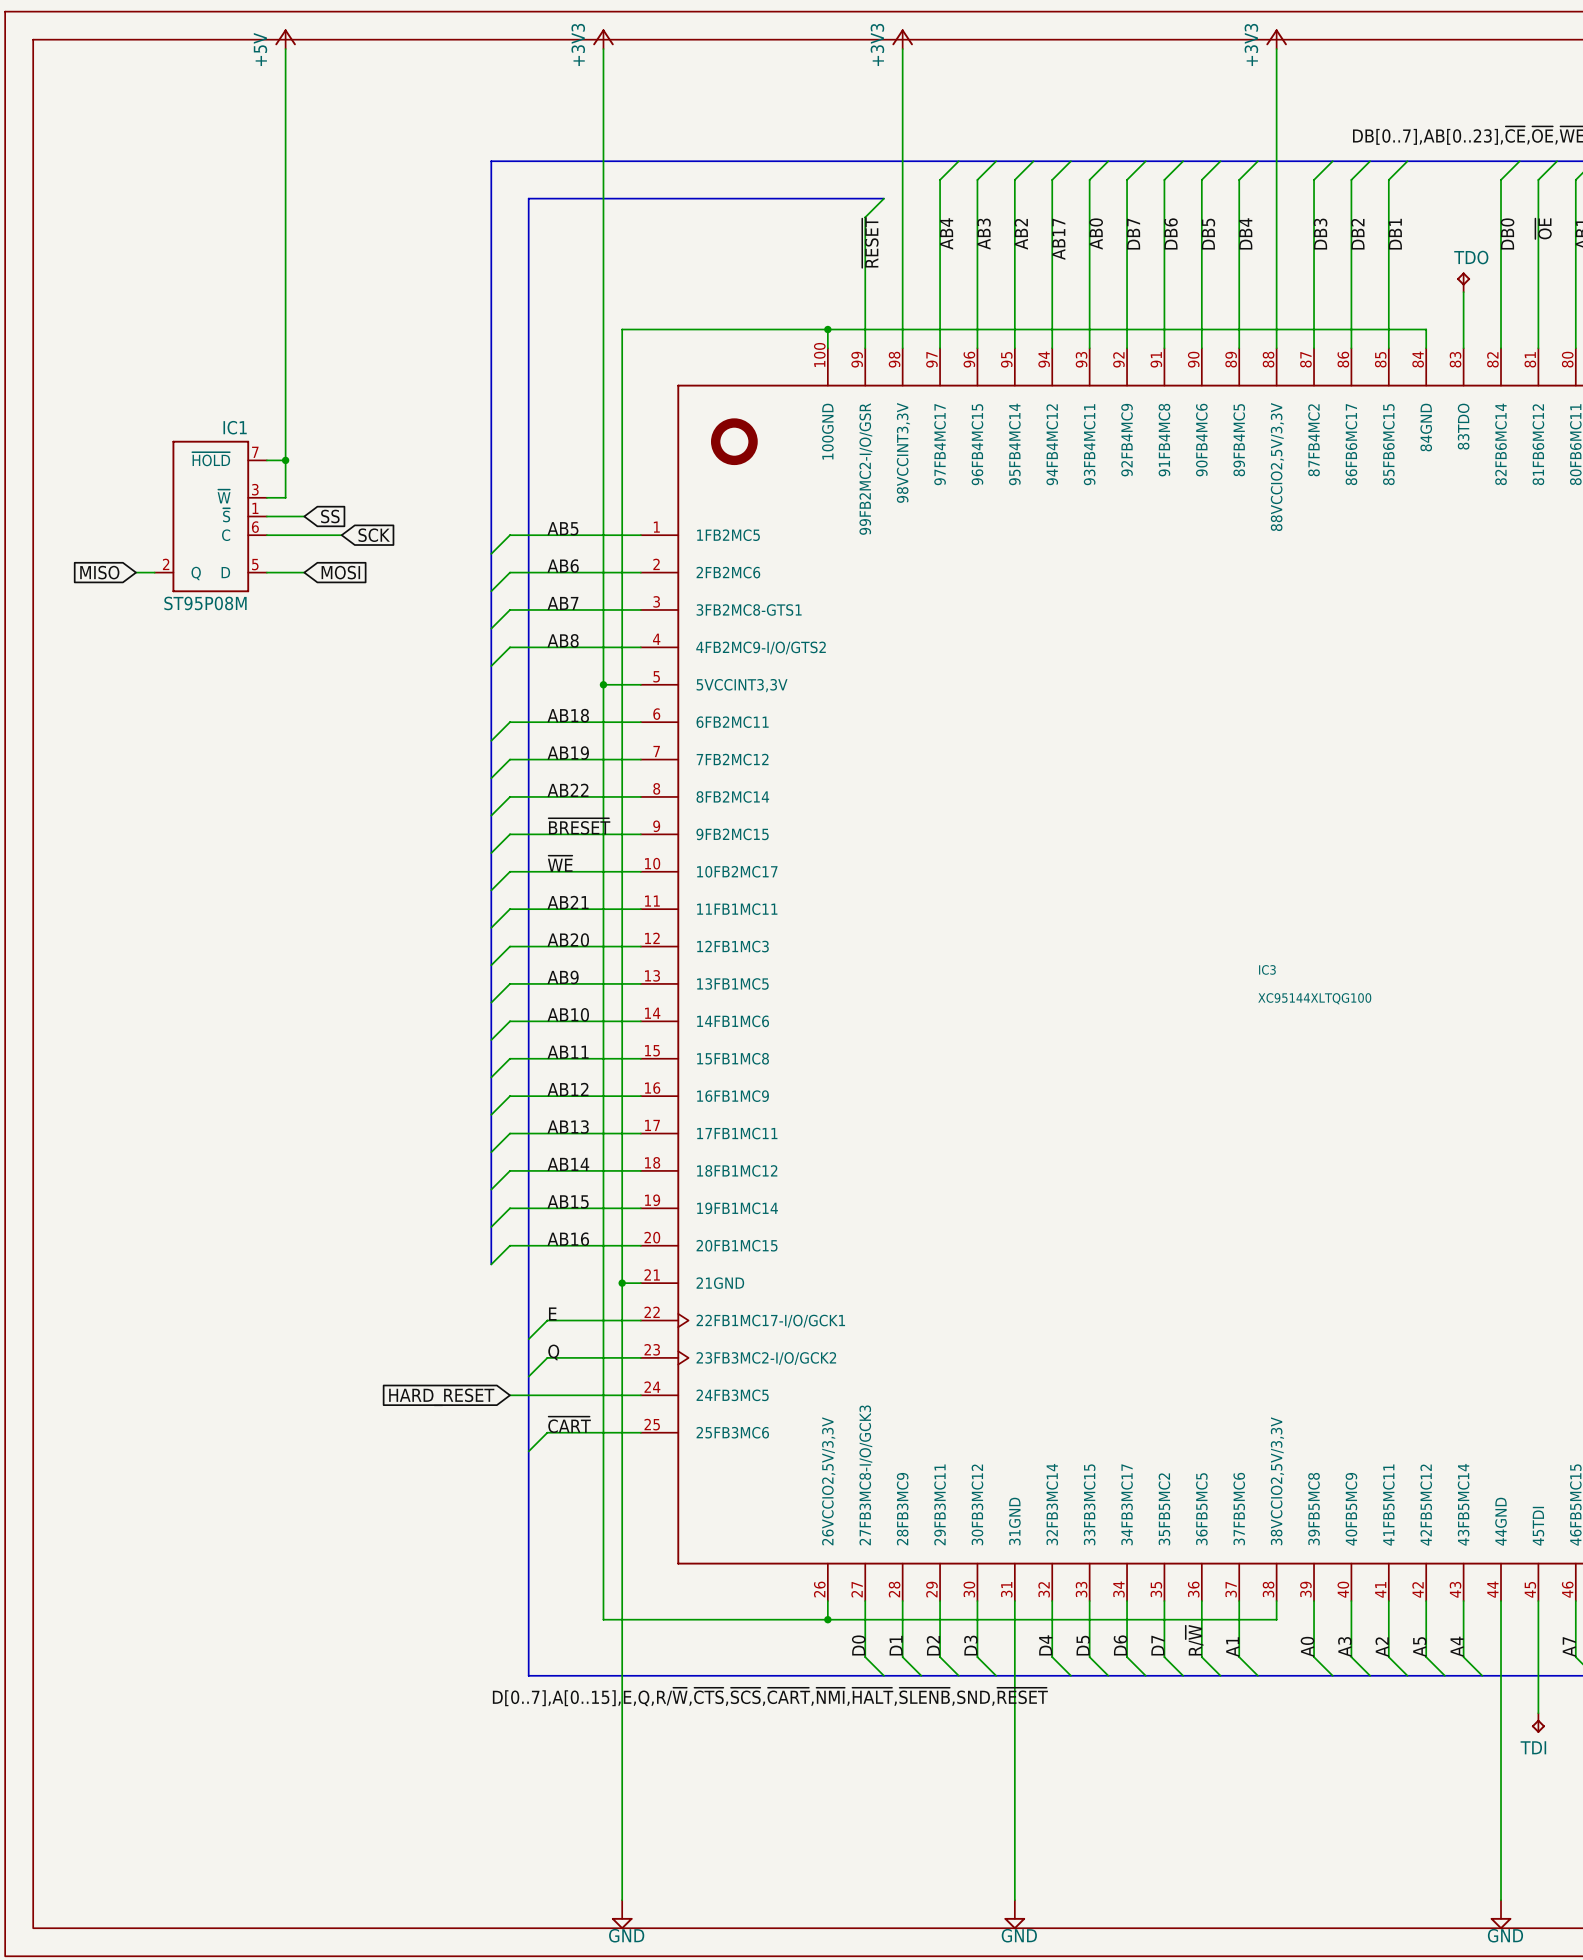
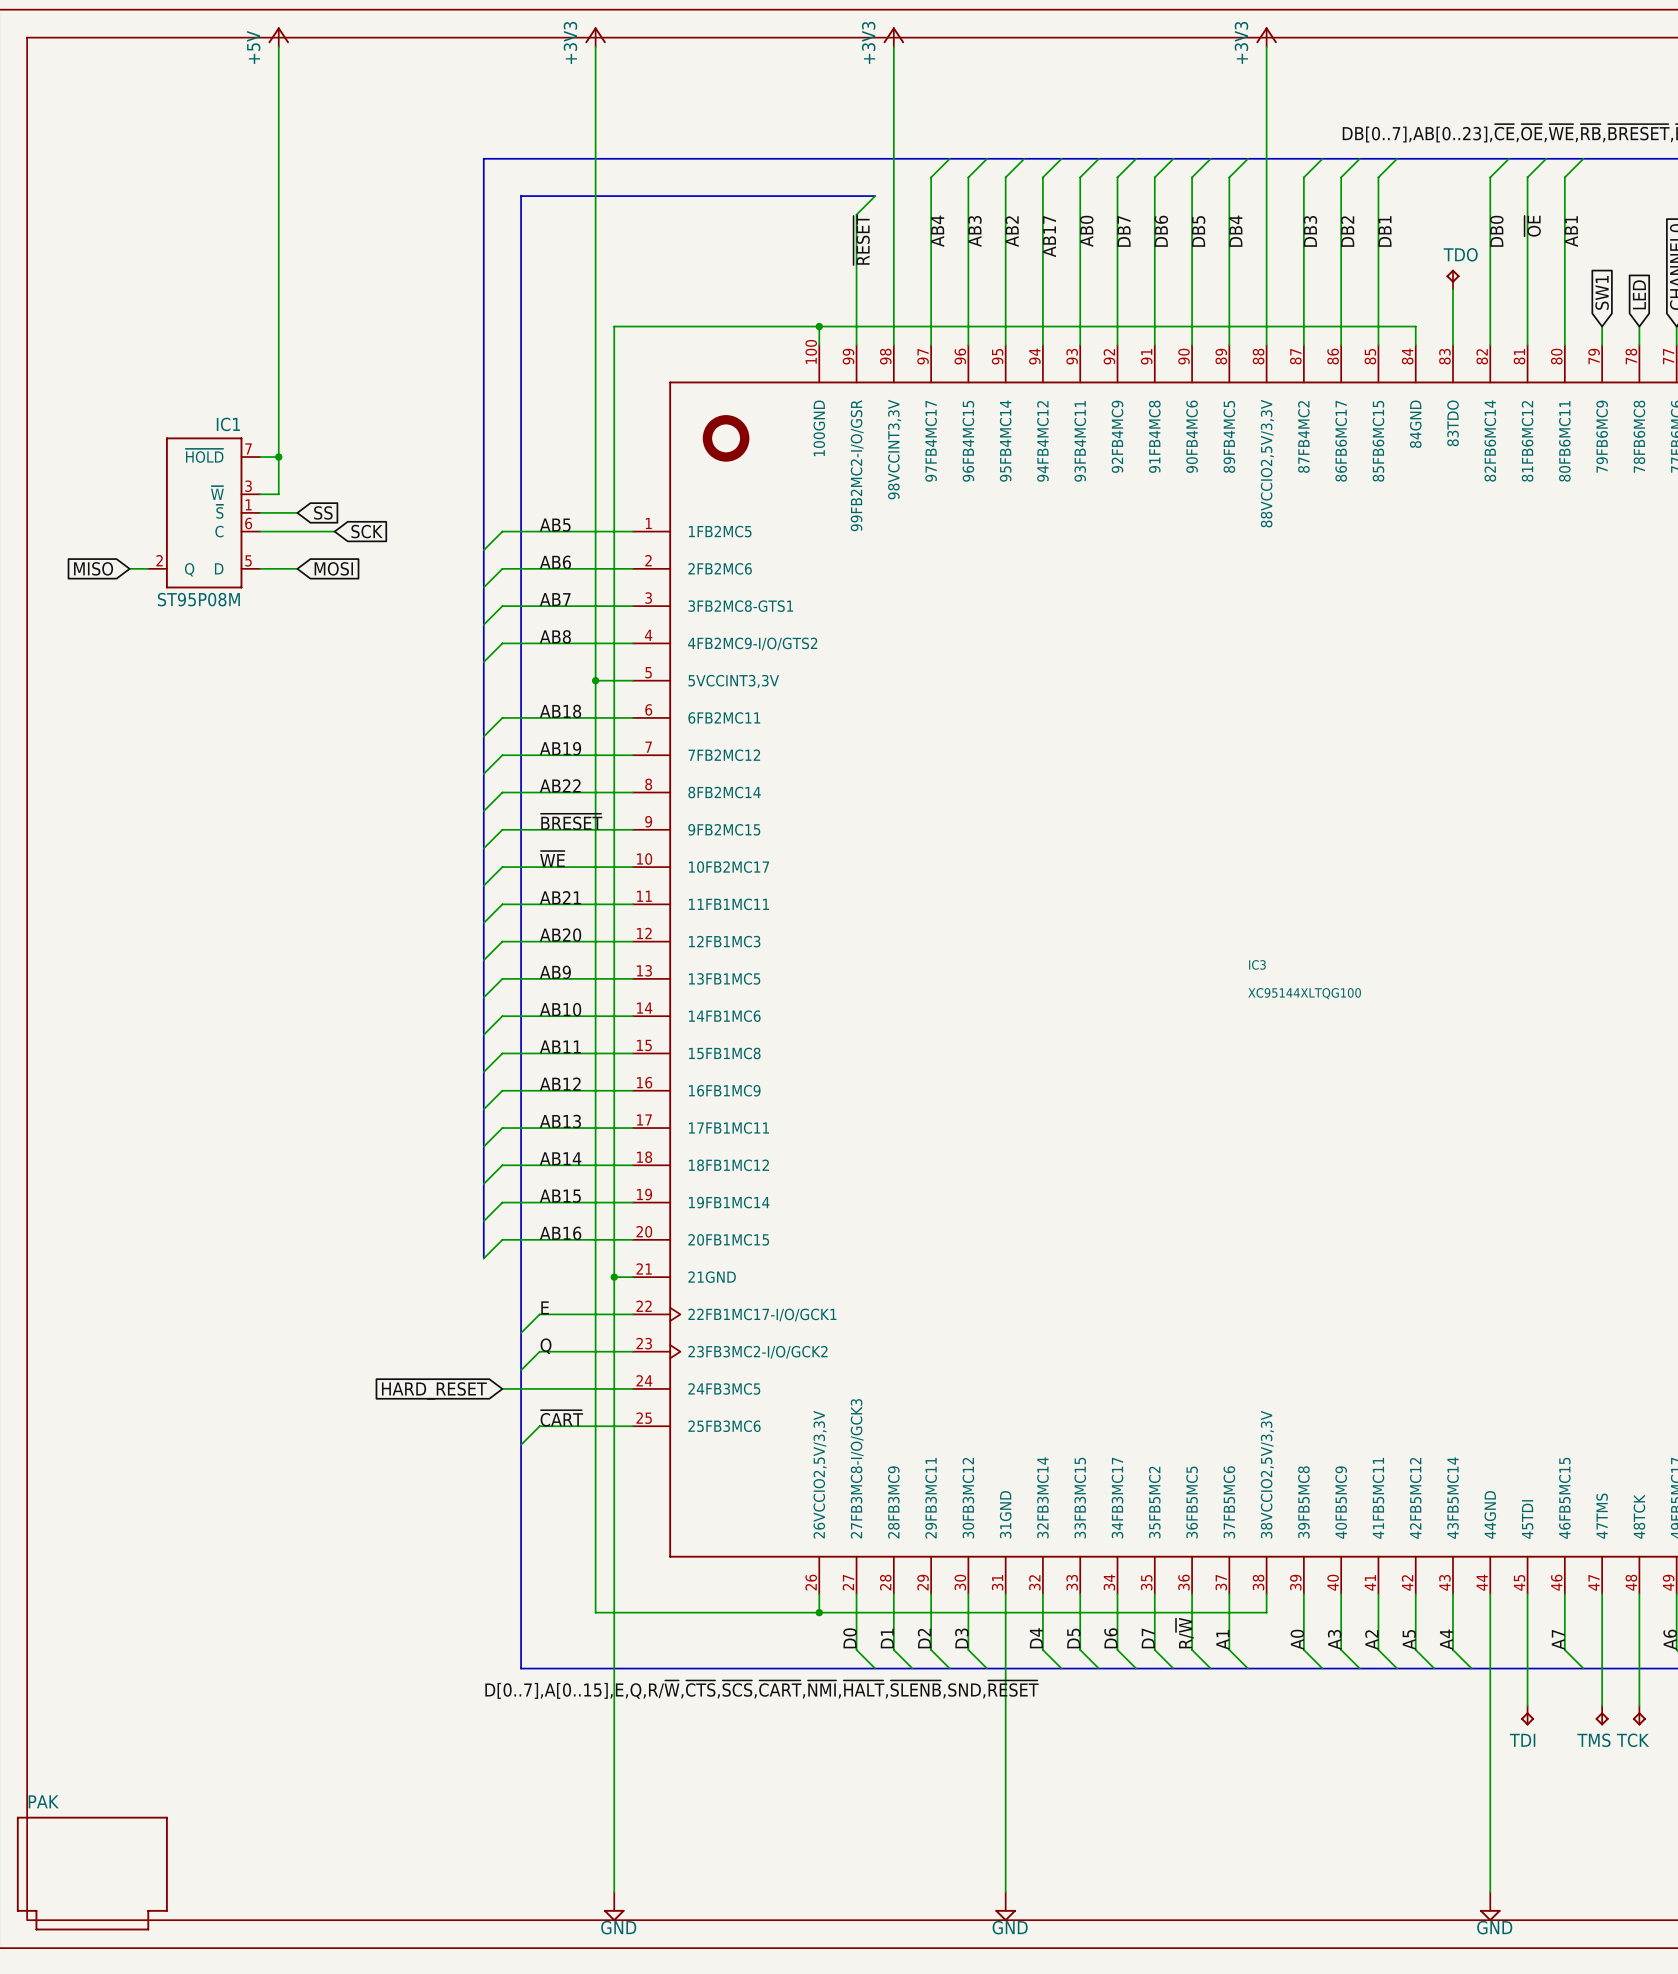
PAK: none -> (92, 1873)

